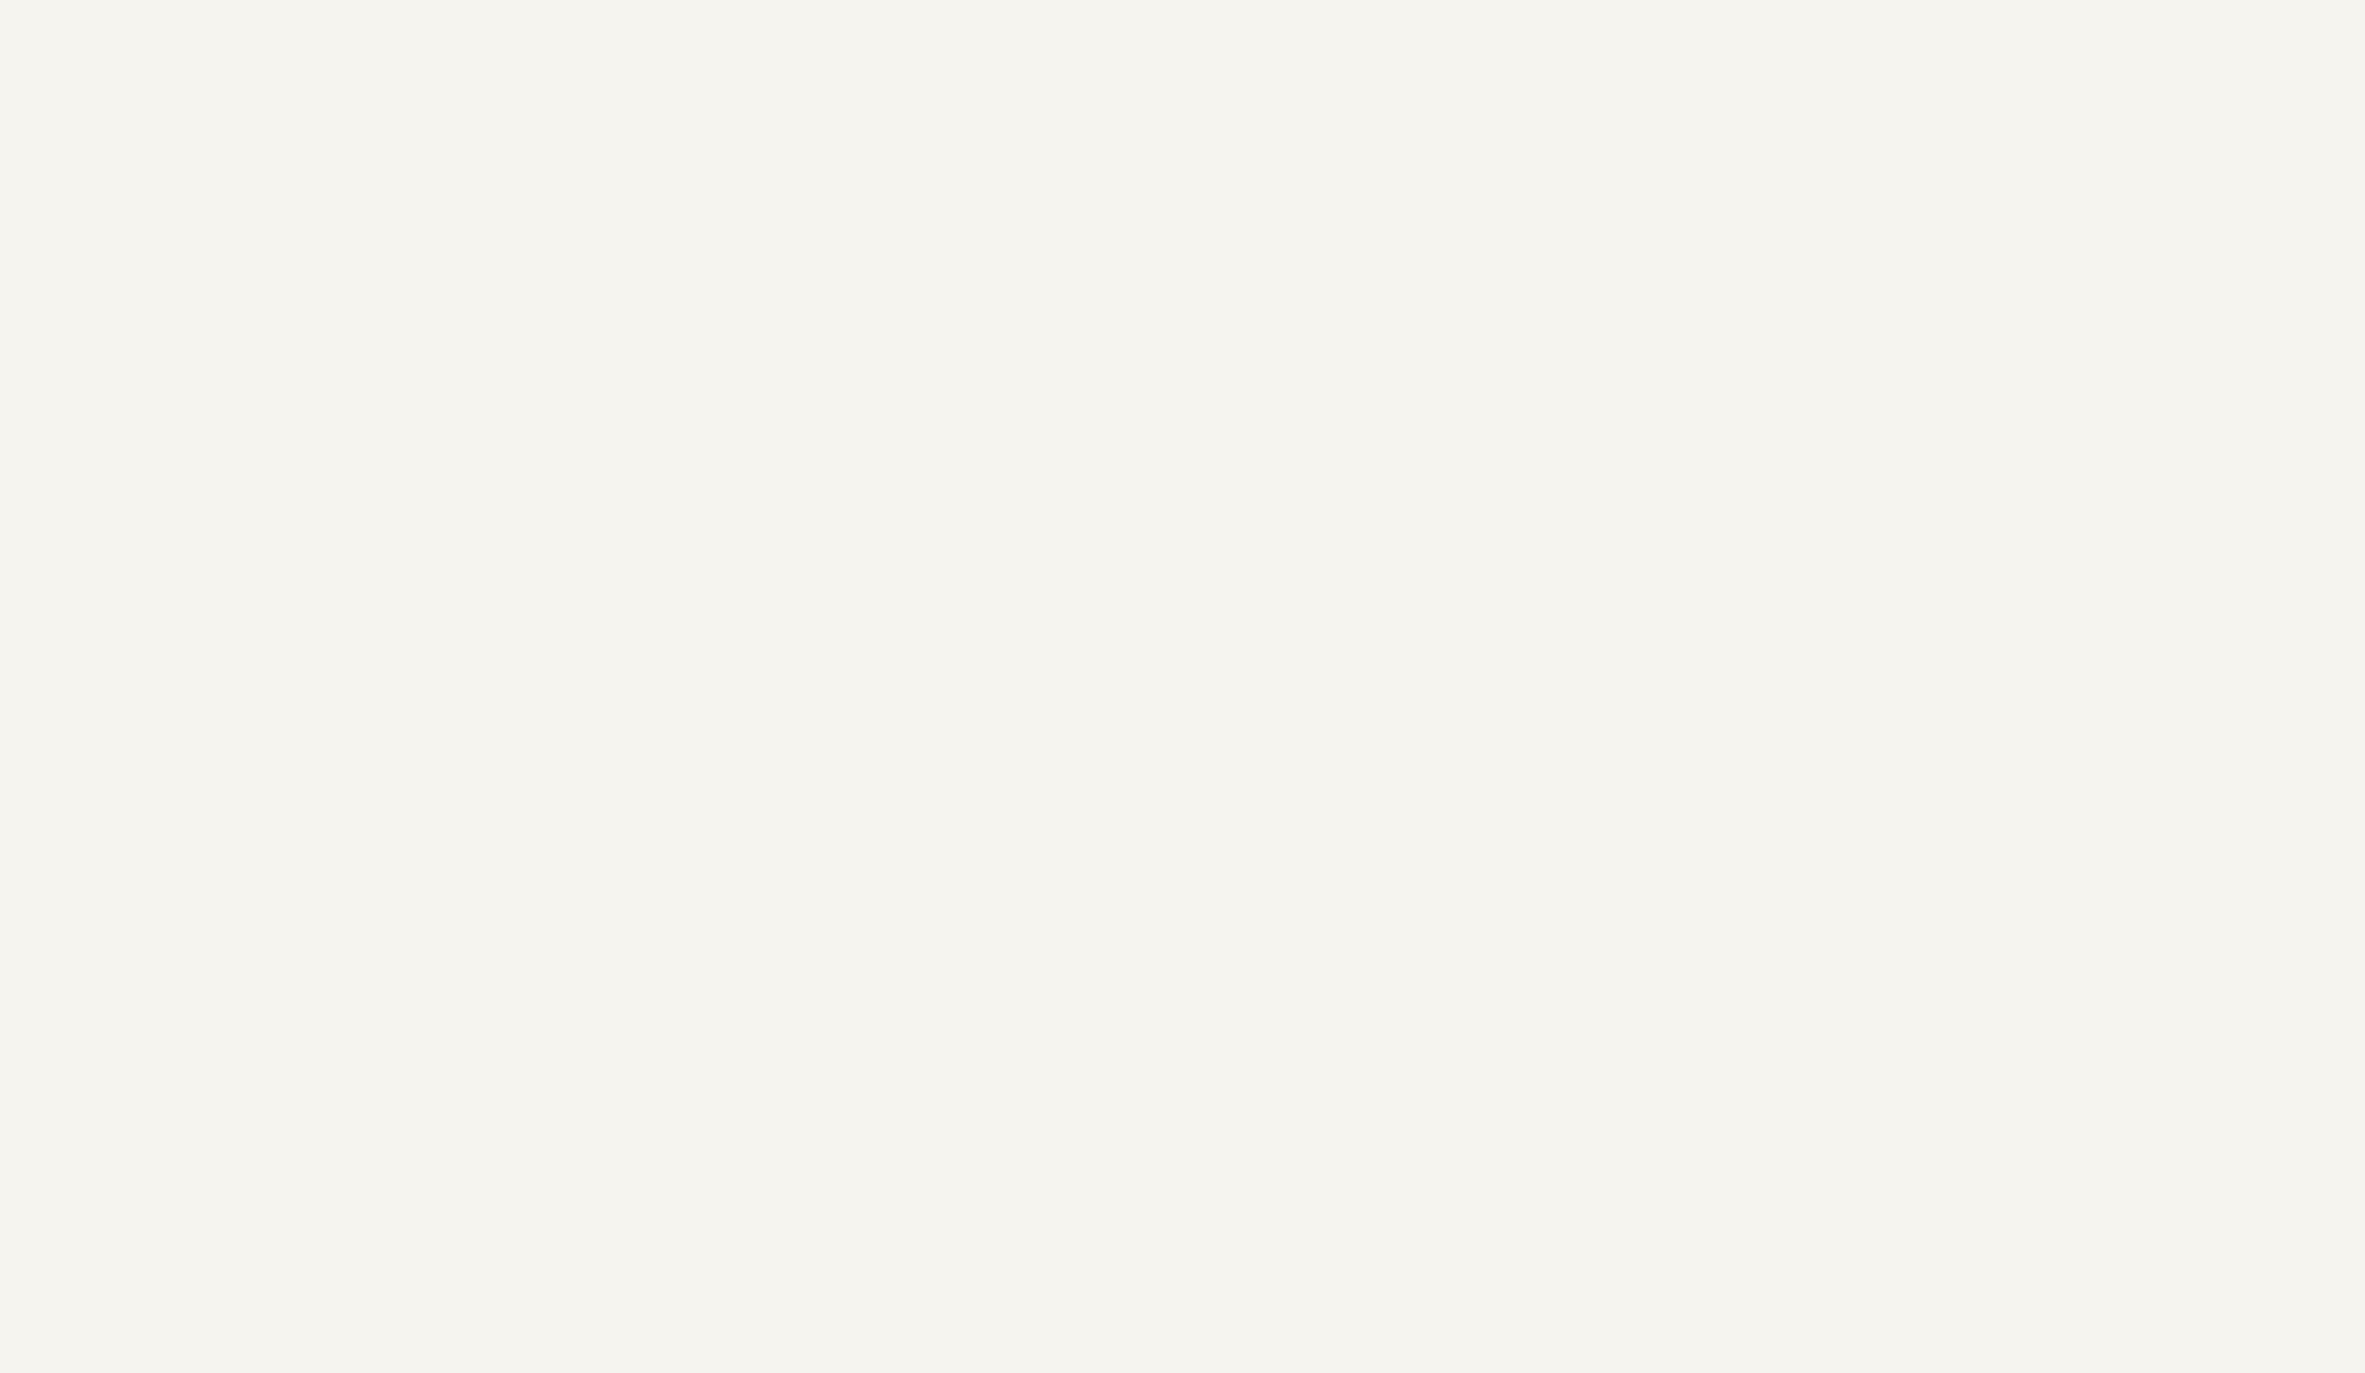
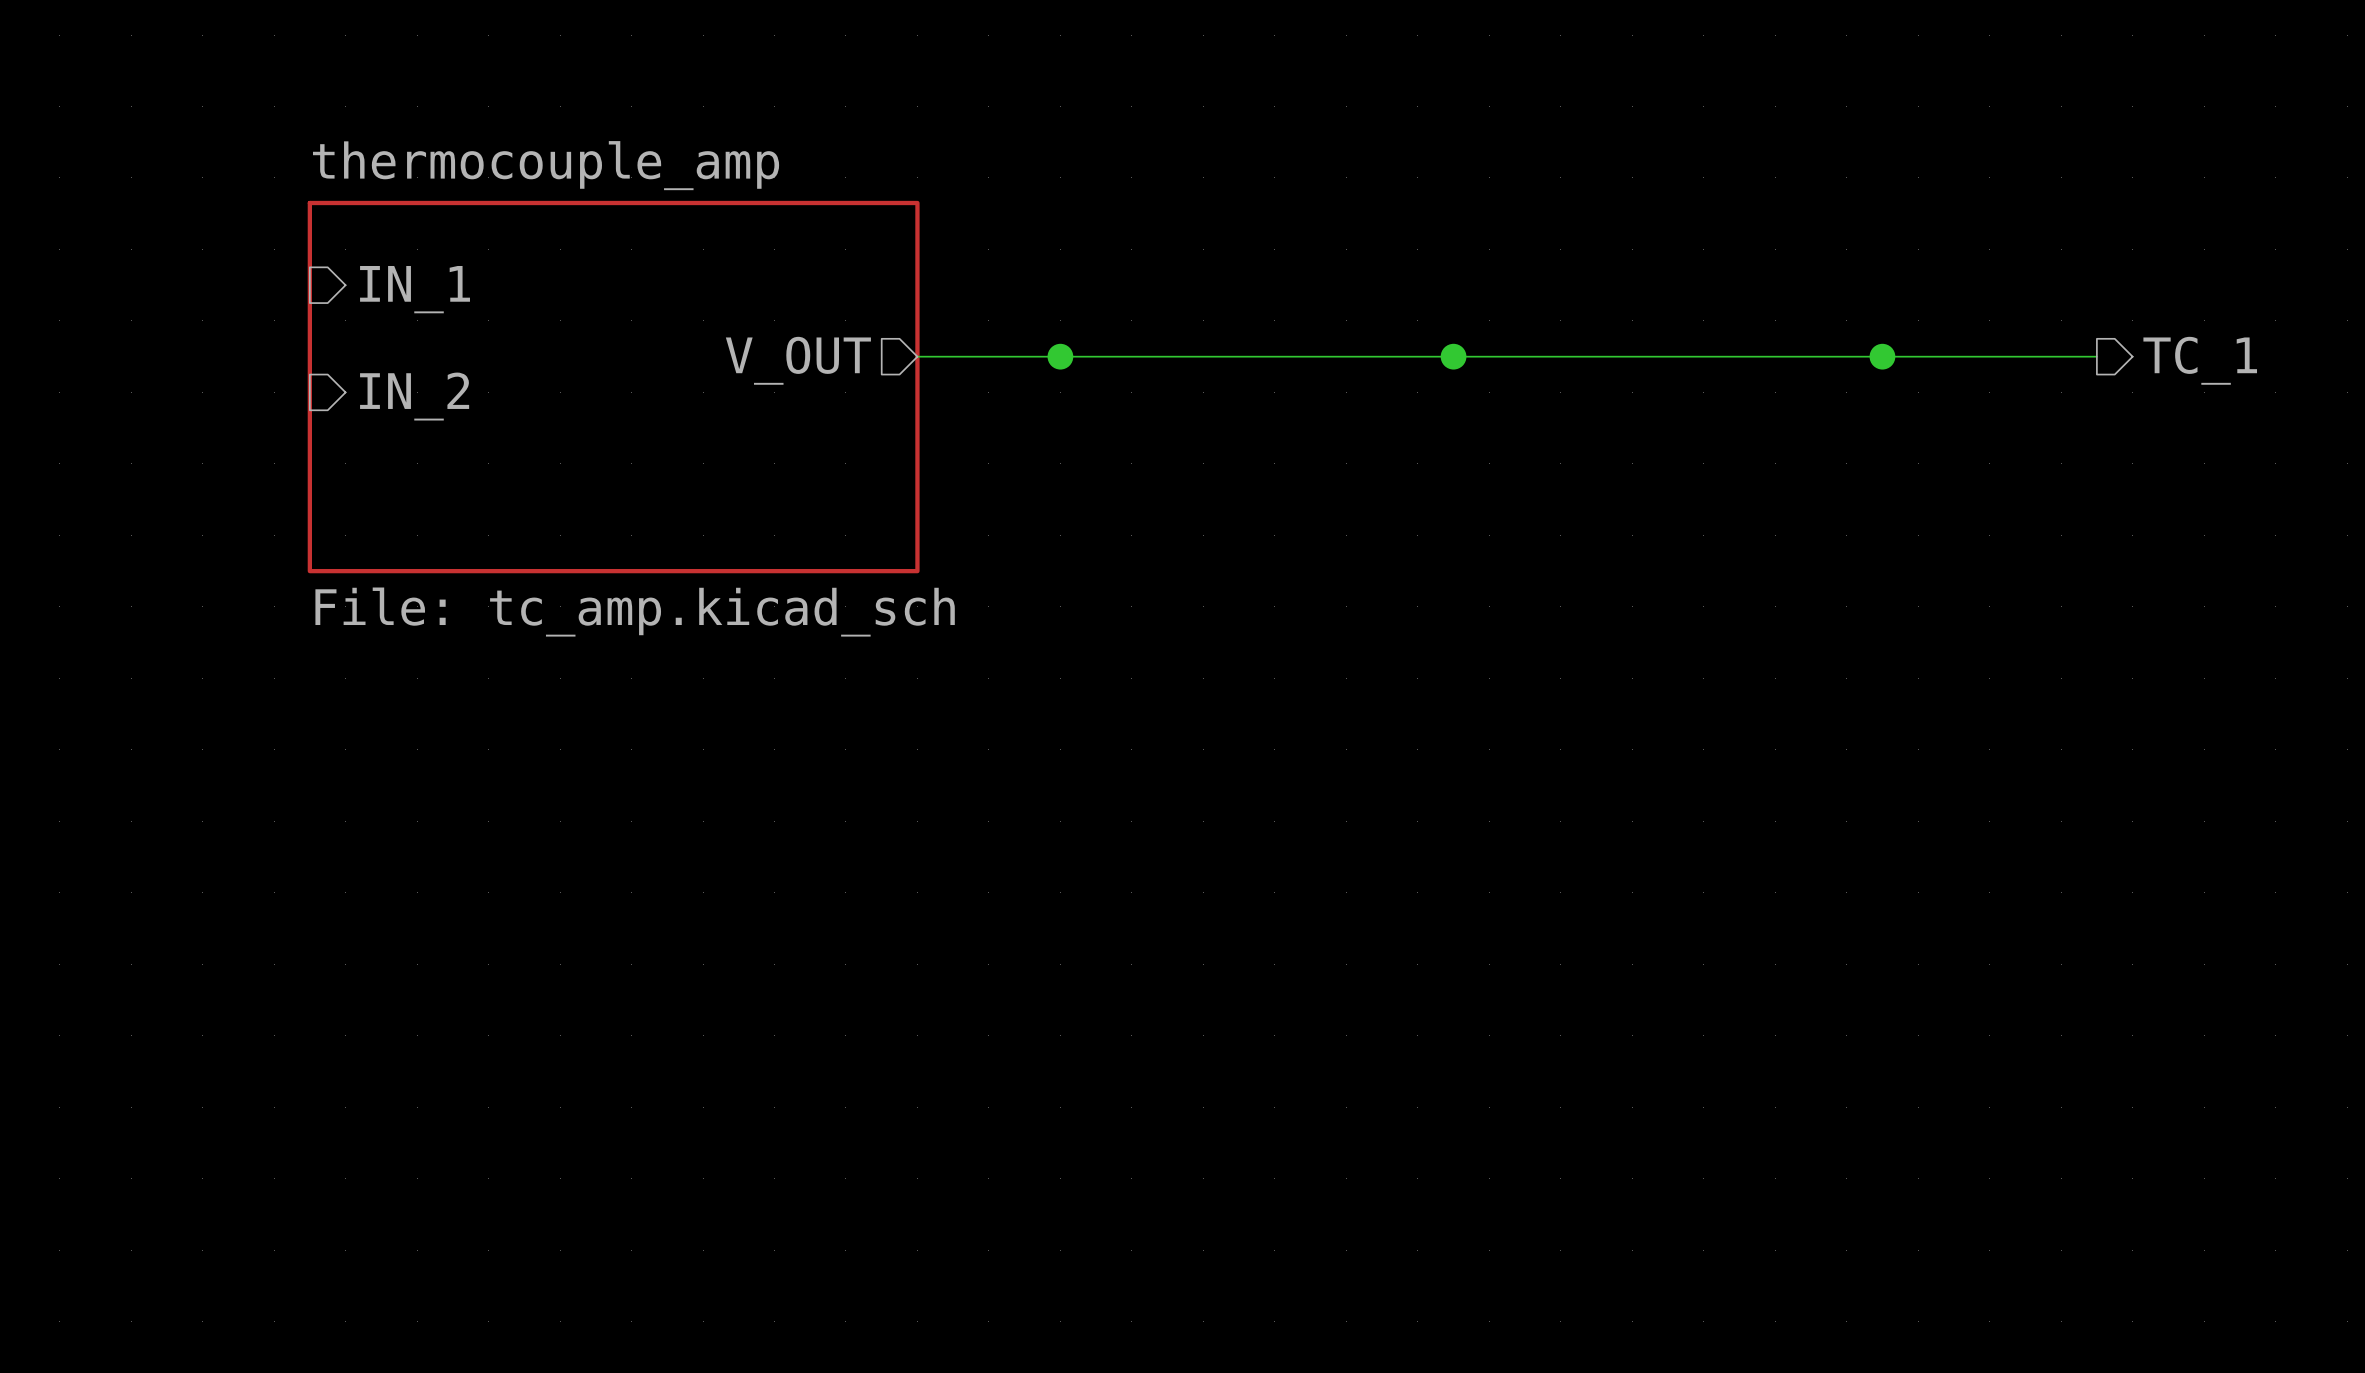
sheet pin: none -> IN_1 (415, 289)
wire: none -> (917, 356) (2096, 356)
junction: none -> (1060, 356)
junction: none -> (1453, 356)
junction: none -> (1882, 356)
sheet pin: none -> V_OUT (798, 360)
hierarchical label: none -> TC_1 (2200, 360)
sheet thermocouple_amp: none -> File: tc_amp.kicad_sch (613, 387)
sheet pin: none -> IN_2 (414, 396)

